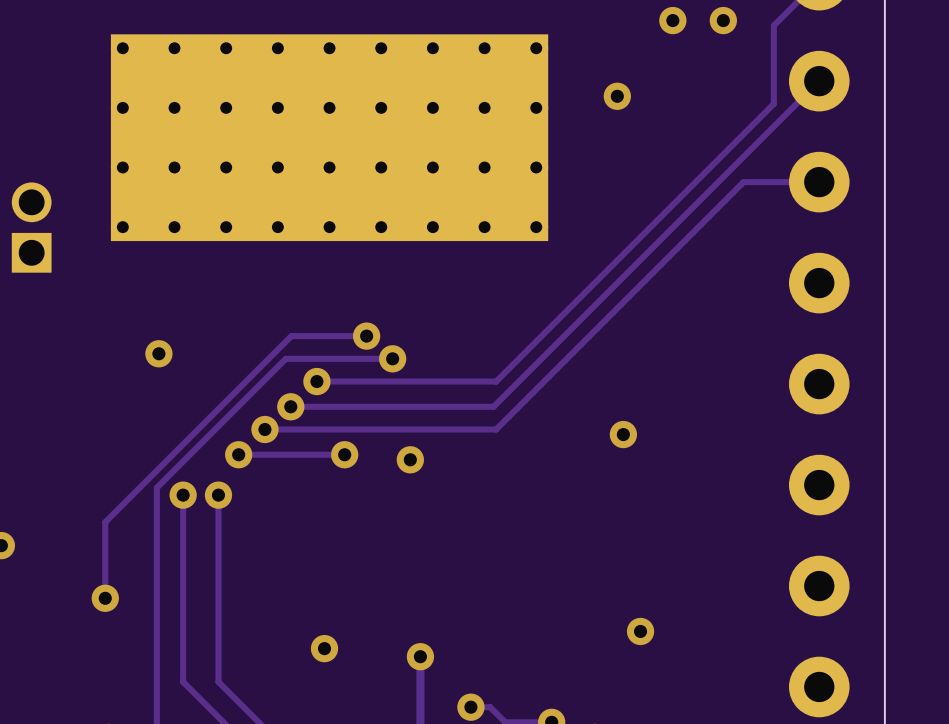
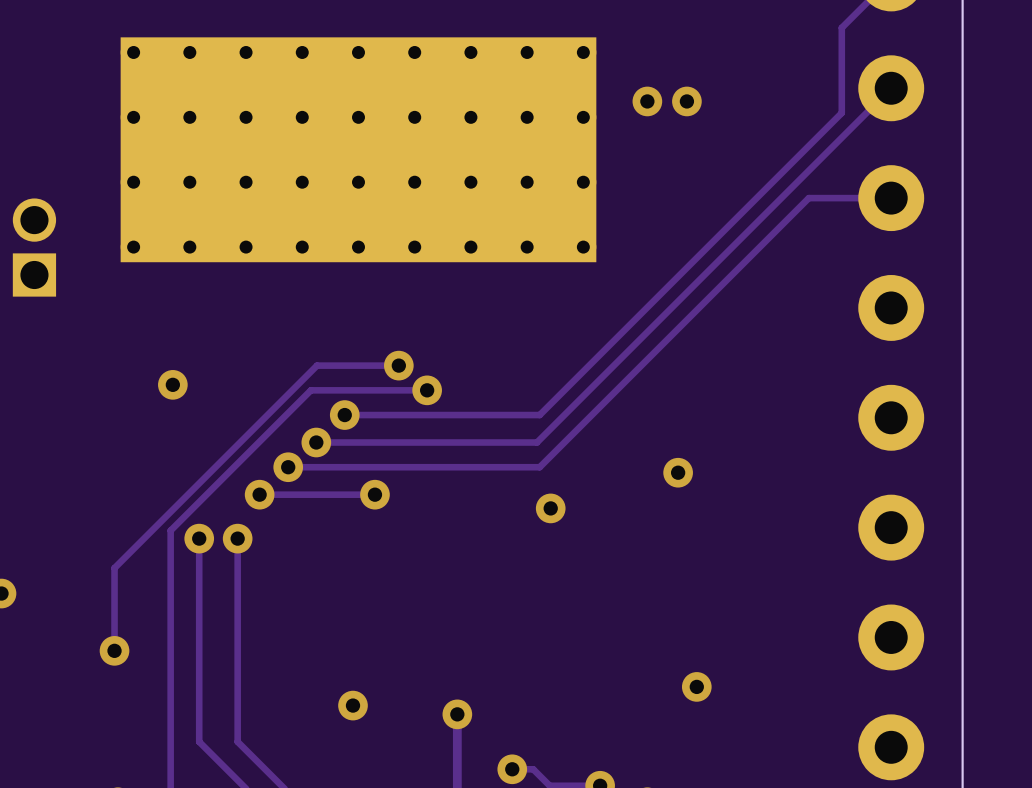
via: (672, 20) -> none
via: (723, 20) -> none
via: none -> (647, 101)
via: none -> (686, 101)
via: (617, 96) -> none
via position: (410, 459) -> (550, 508)

